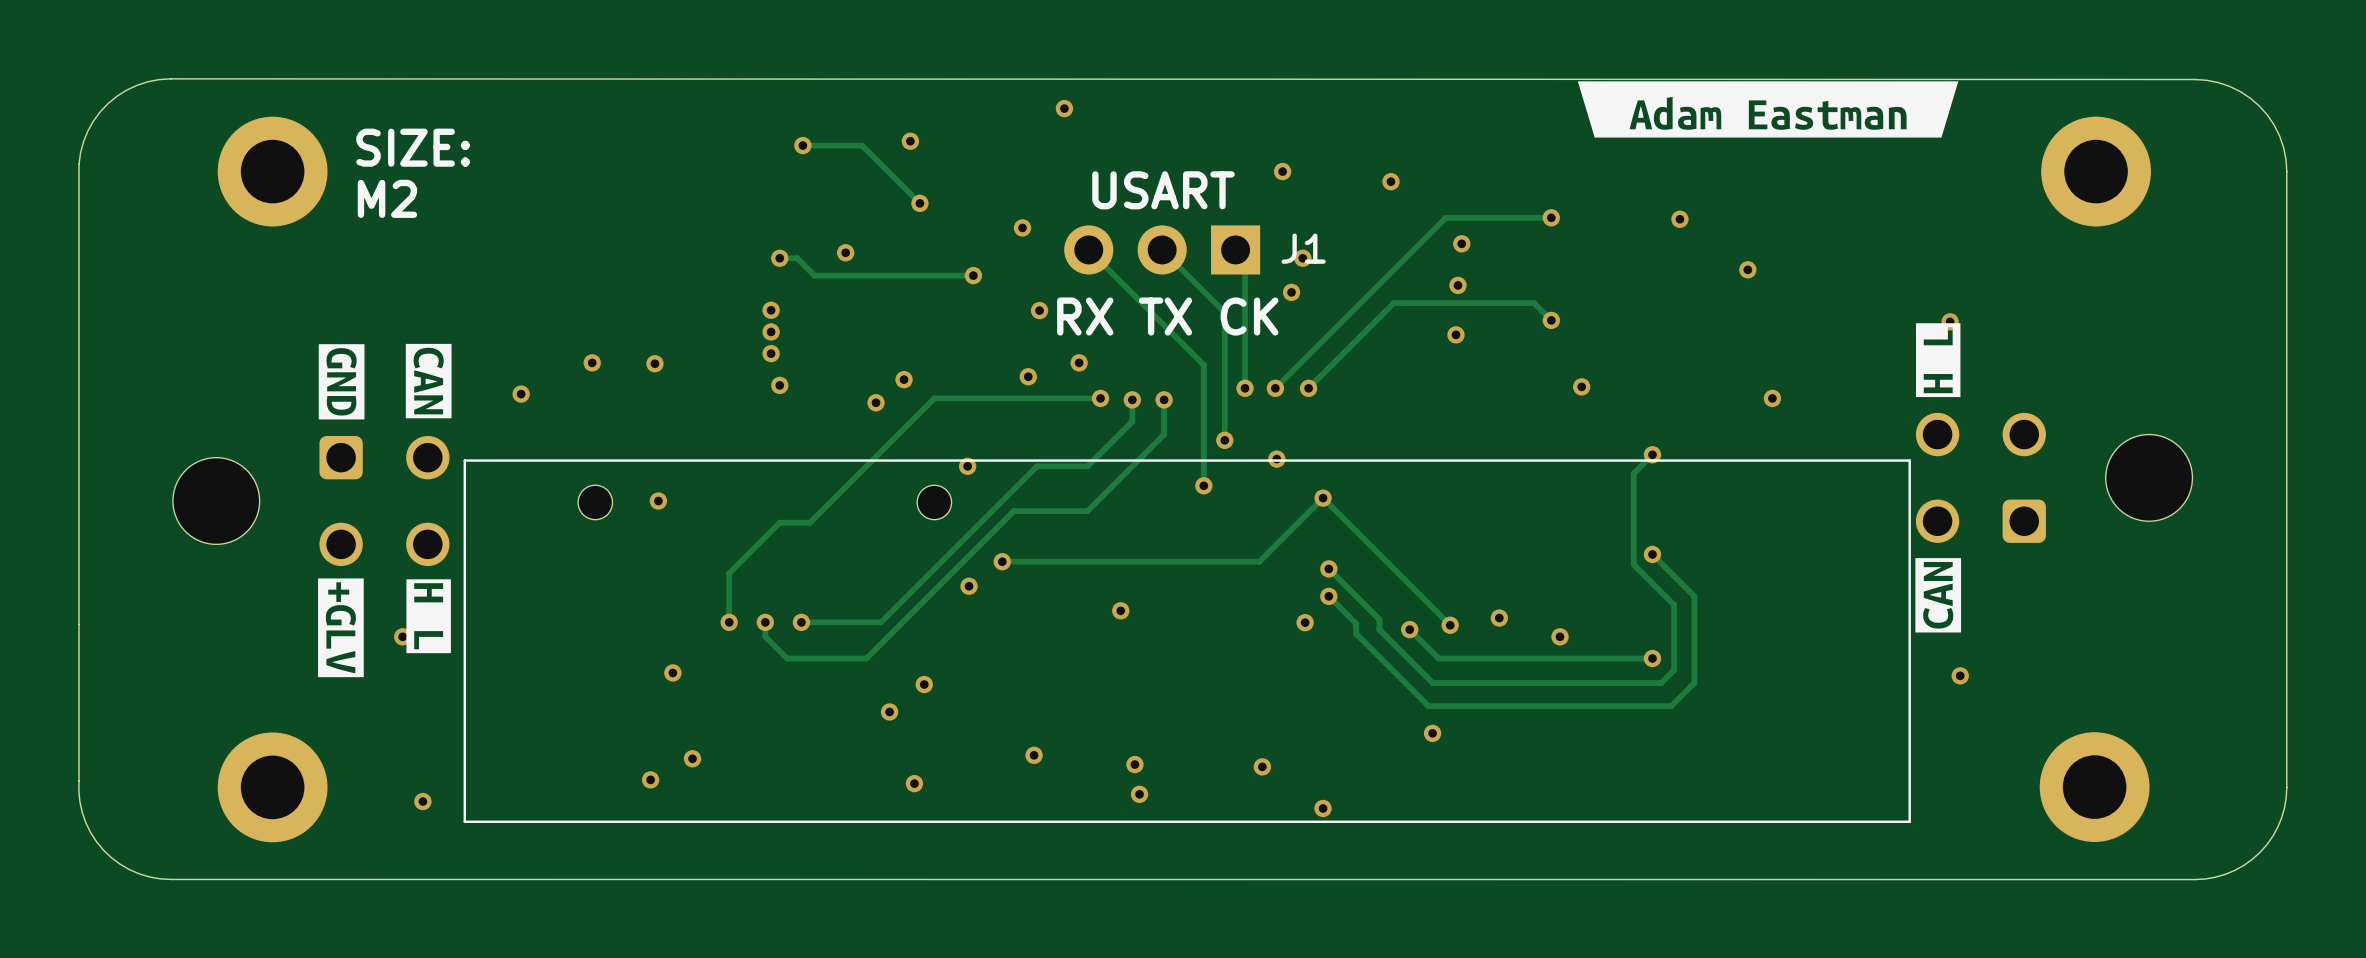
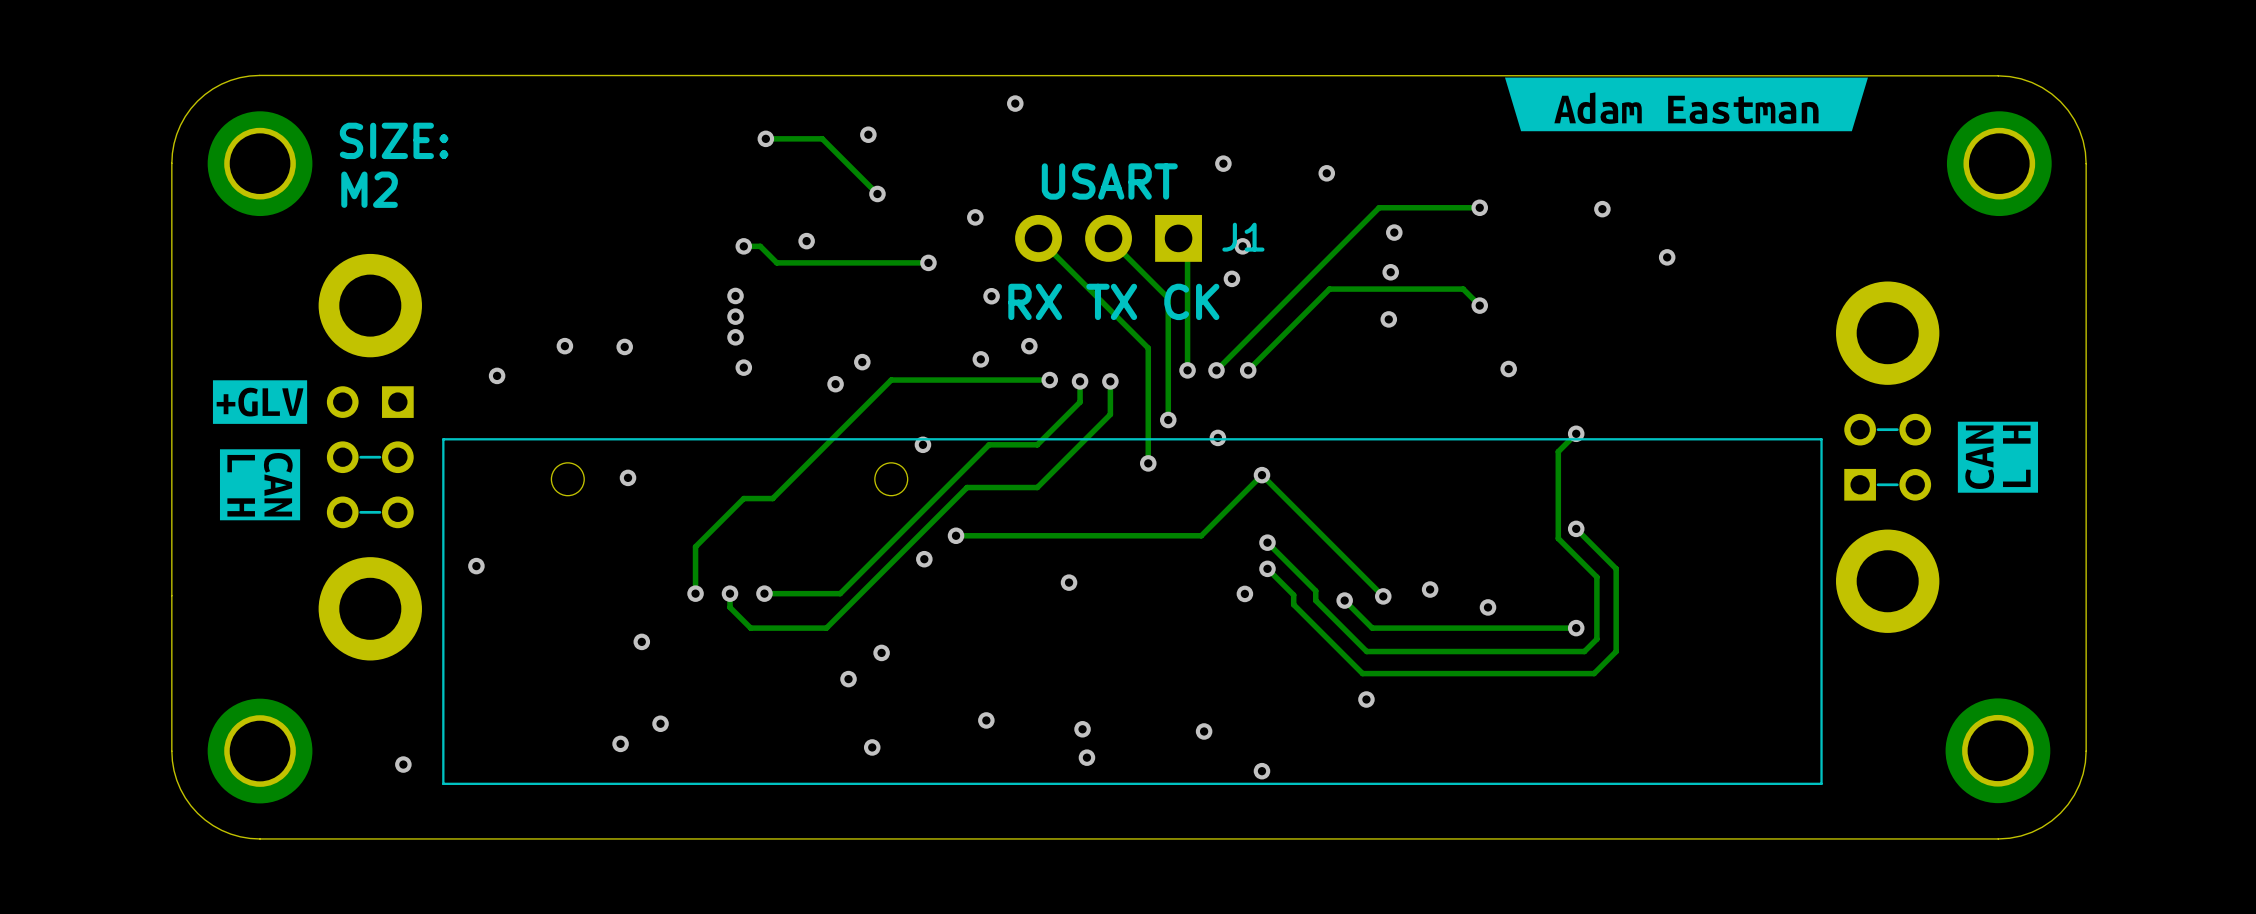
board edge: (170, 78) (2194, 79) (2218, 82) (2229, 86) (2250, 98) (2267, 115) (2279, 136) (2286, 159) (2286, 787) (2281, 817) (2266, 844) (2252, 859) (2225, 874) (2194, 879) (171, 879) (139, 873) (120, 864) (96, 841) (82, 812) (78, 791) (79, 164) (87, 131) (108, 103) (137, 85) (170, 78) -> (259, 75) (1998, 75) (2031, 82) (2051, 93) (2068, 110) (2079, 130) (2085, 152) (2086, 751) (2079, 784) (2060, 813) (2042, 827) (2021, 835) (1998, 838) (260, 838) (230, 834) (205, 819) (191, 806) (176, 780) (172, 761) (171, 163) (174, 143) (180, 125) (197, 101) (221, 84) (240, 77) (259, 75)
via: (1950, 321) -> none
drawing: [1915, 323, 1961, 398] -> none
drawing: [405, 343, 452, 419] -> none
drawing: [318, 344, 365, 420] -> none
drawing: none -> [212, 380, 308, 521]
via: (1772, 398) -> none
drawing: none -> [1957, 421, 2039, 493]
line: none -> (1897, 429) (1878, 429)
part: (2054, 477) -> none
part: none -> (370, 457)
line: none -> (379, 457) (360, 457)
part: none -> (1887, 457)
part: (311, 501) -> none
line: none -> (1897, 484) (1878, 484)
line: none -> (379, 512) (360, 512)
drawing: [1915, 558, 1962, 633] -> none
drawing: [318, 578, 364, 678] -> none
drawing: [406, 579, 451, 654] -> none
via position: (402, 636) -> (476, 566)
via: (1960, 675) -> none

